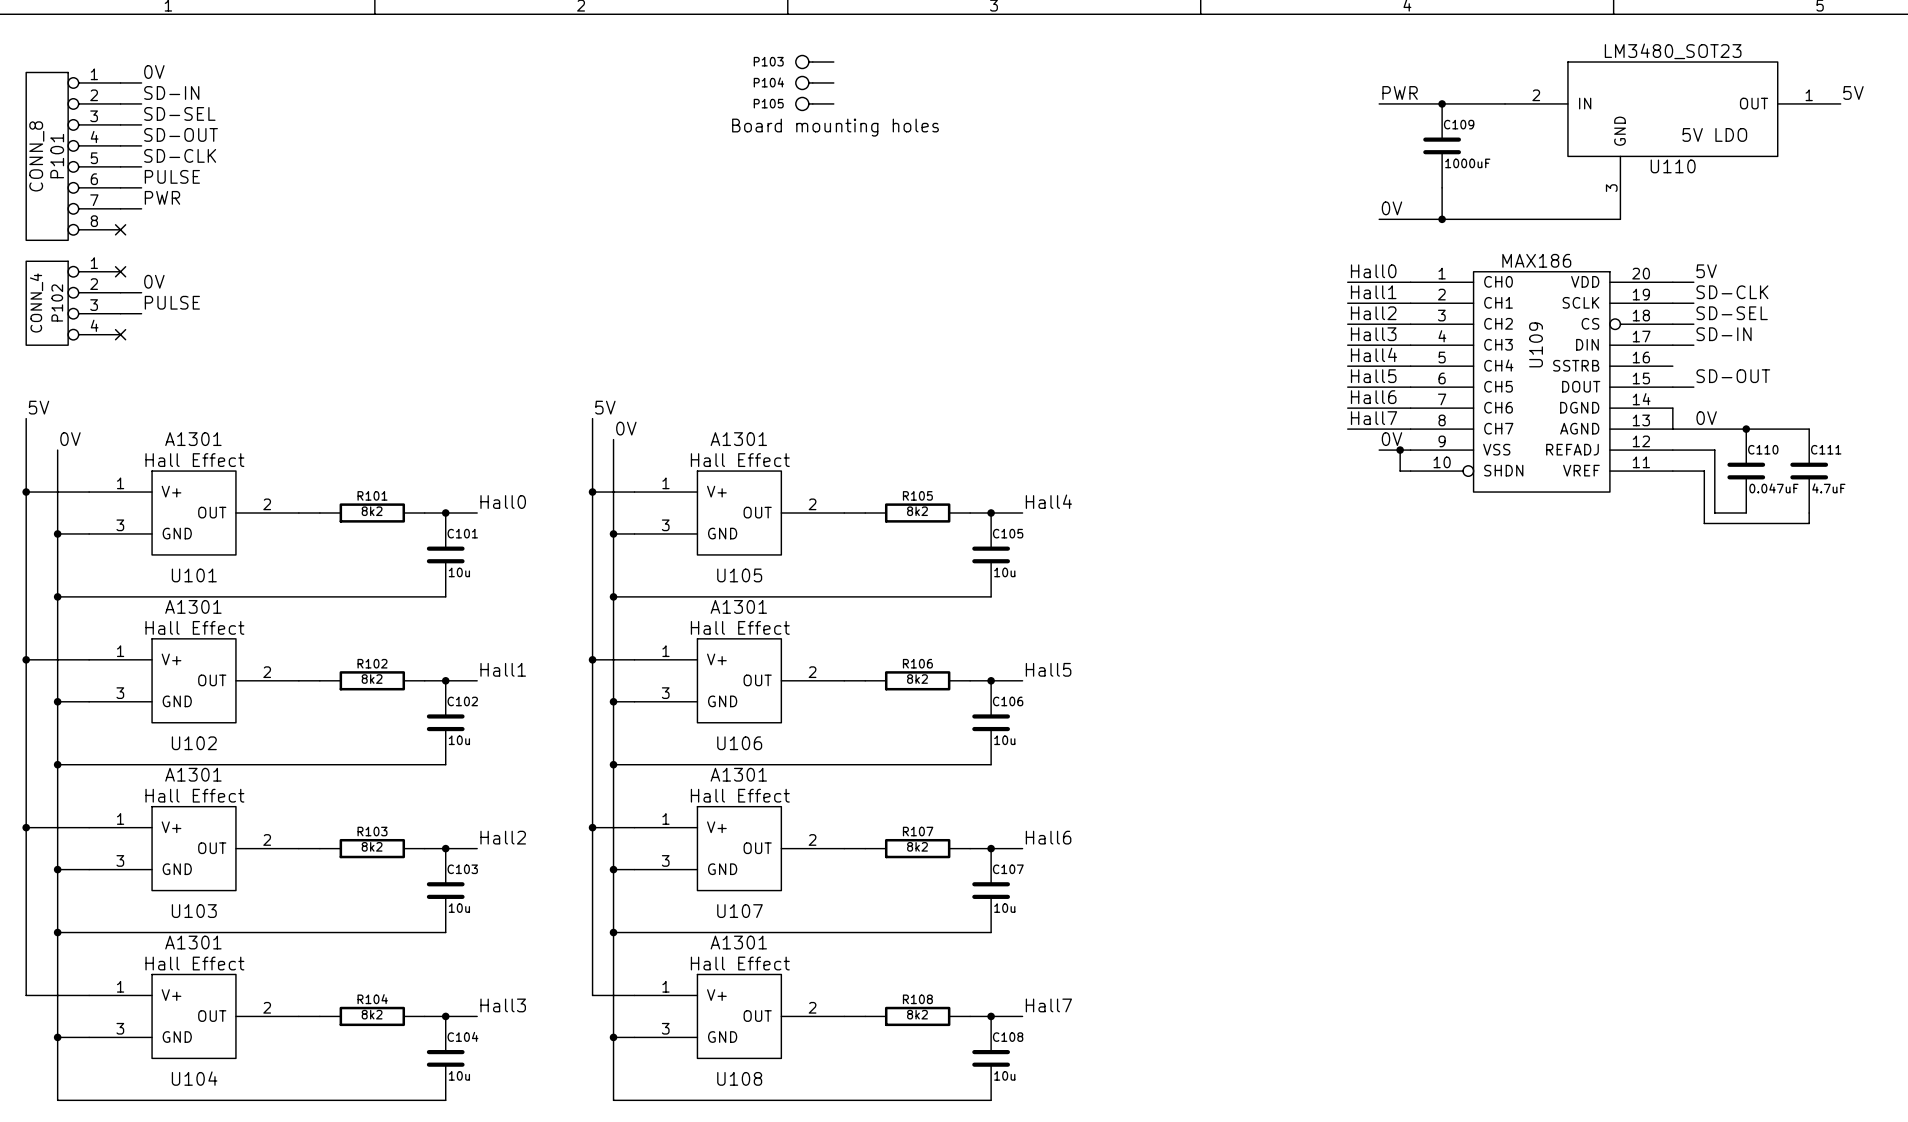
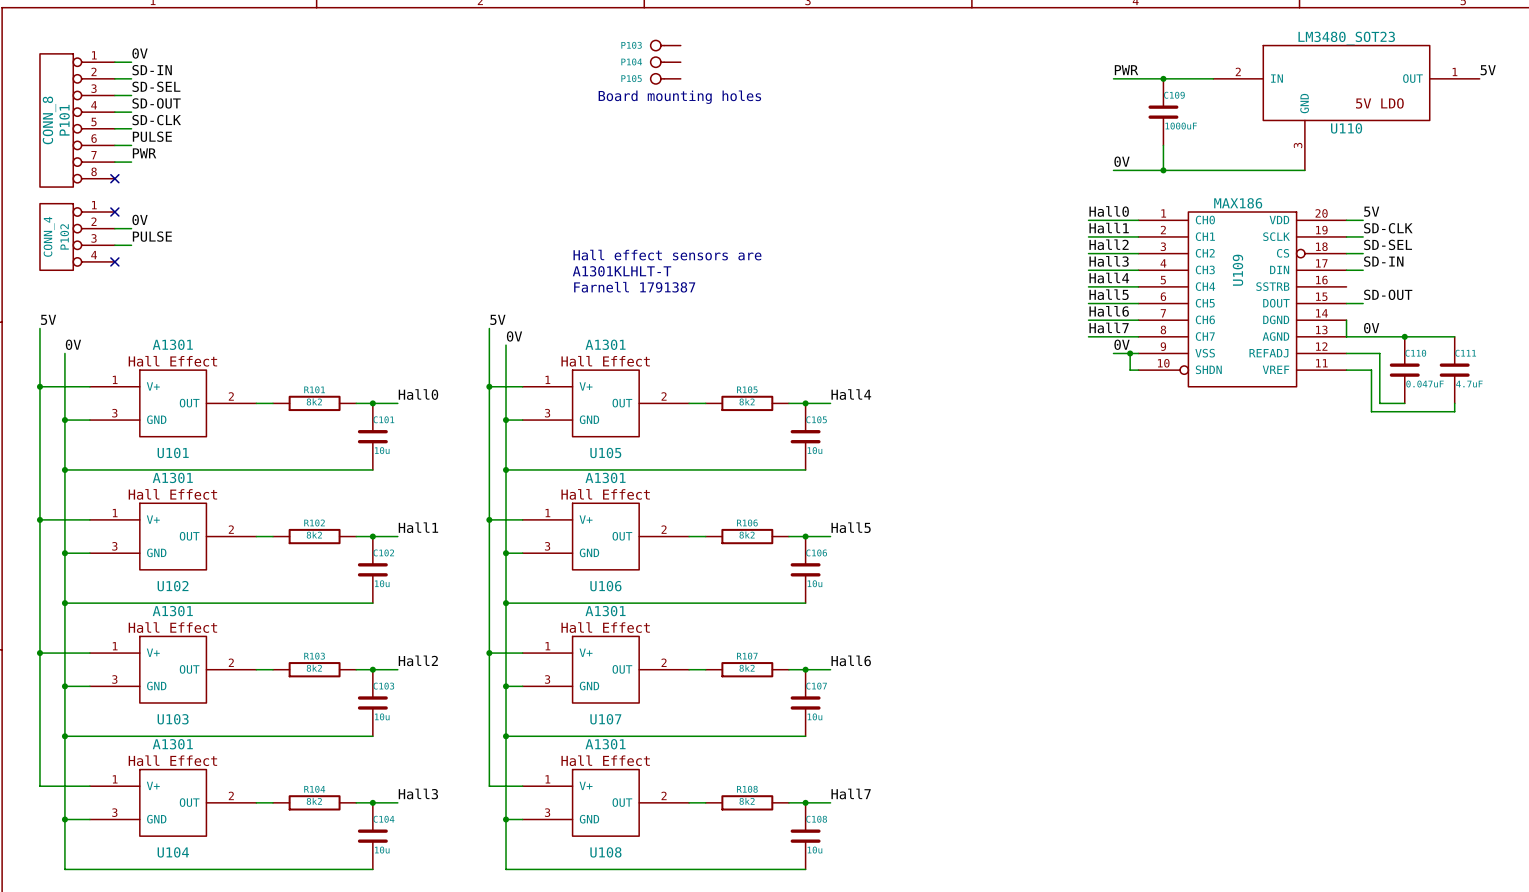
text: none -> Hall effect sensors are (667, 255)
text: none -> A1301KLHLT-T (622, 271)
text: none -> Farnell 1791387 (634, 287)

